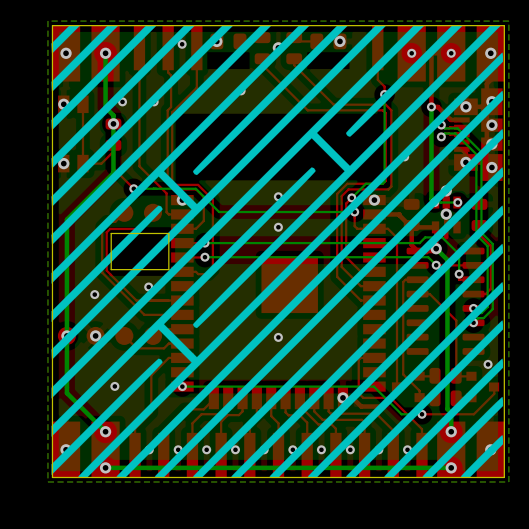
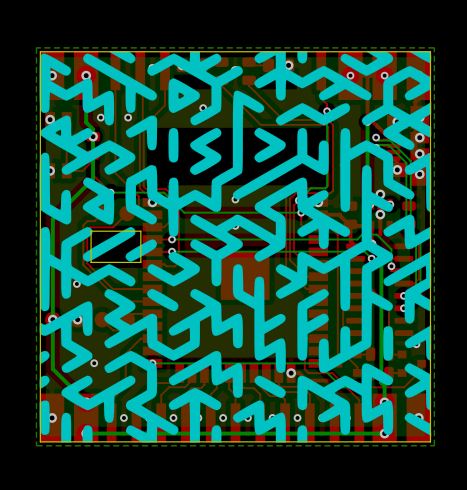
drawing shape: [51, 25, 504, 478] -> [39, 51, 432, 443]

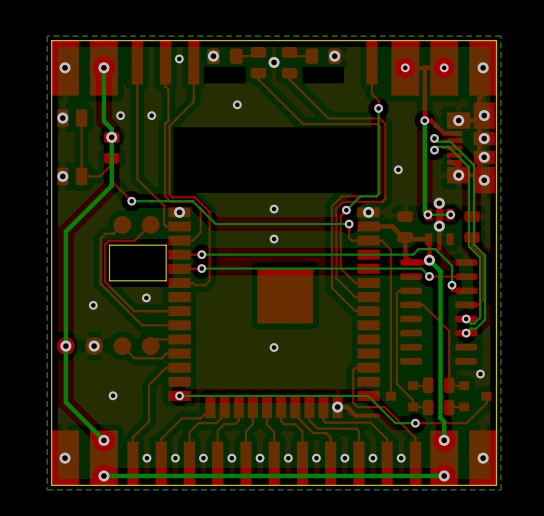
drawing: [39, 51, 432, 443] -> none

